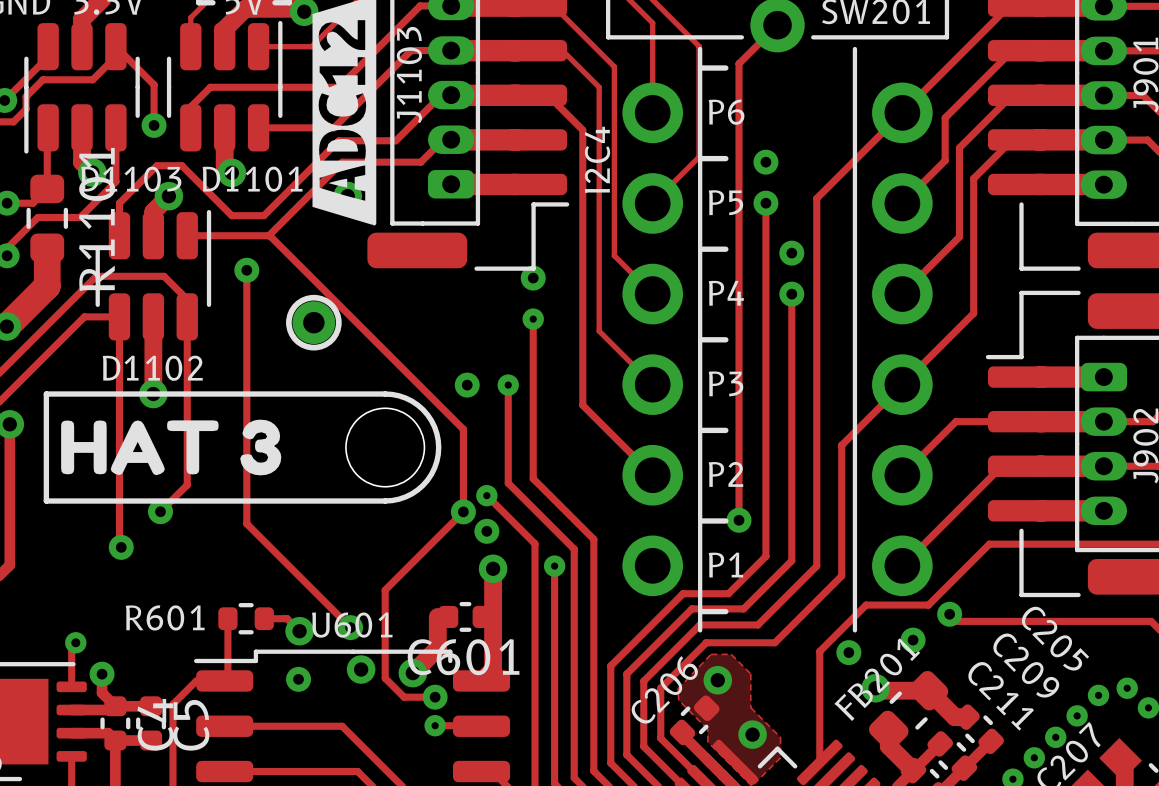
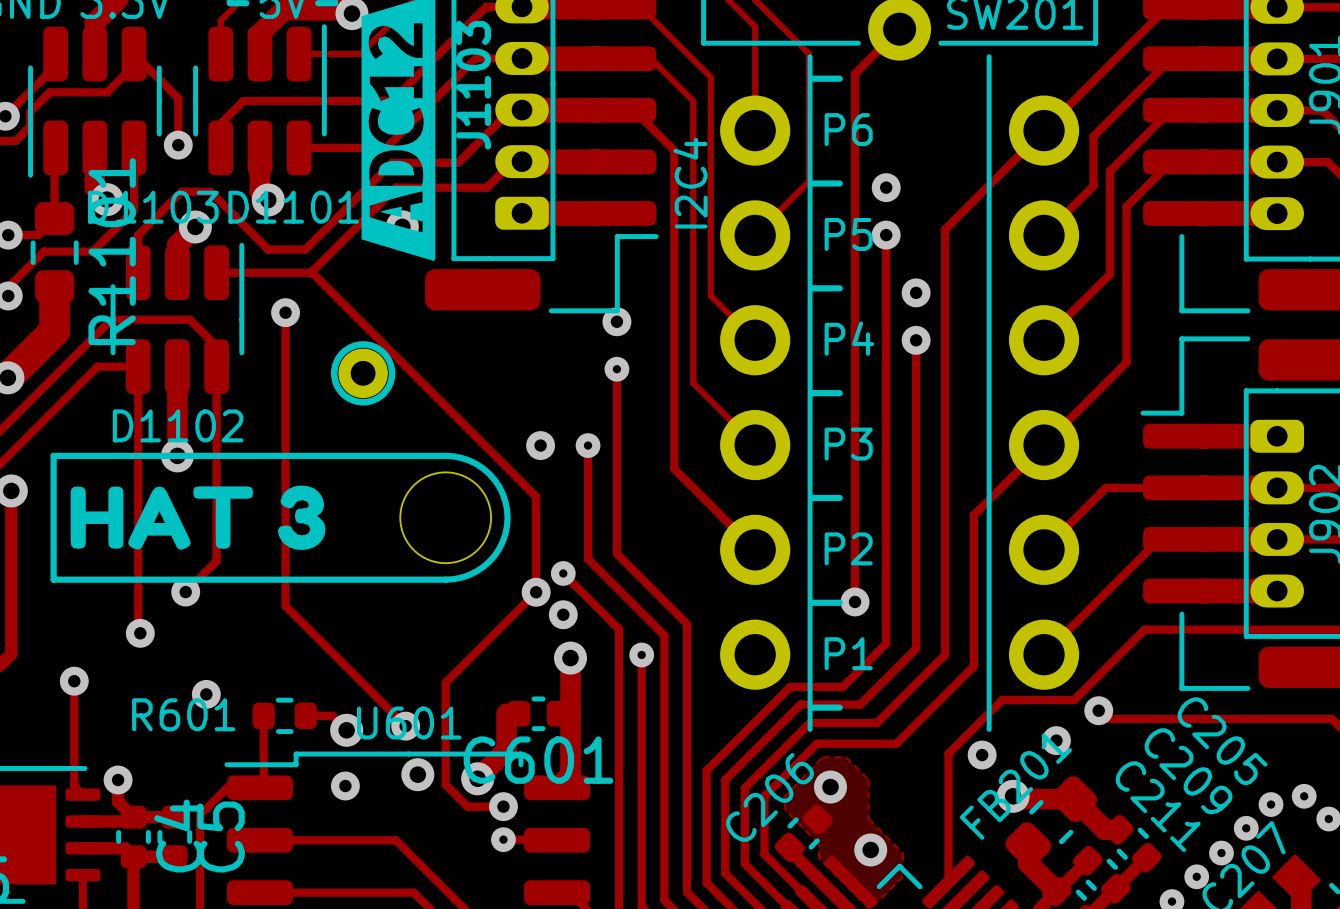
via: none -> (74, 681)
via: none -> (206, 694)
track: (75, 642) (71, 646) (71, 686) -> (74, 681) (74, 786) (82, 794)
via: (75, 642) -> none

